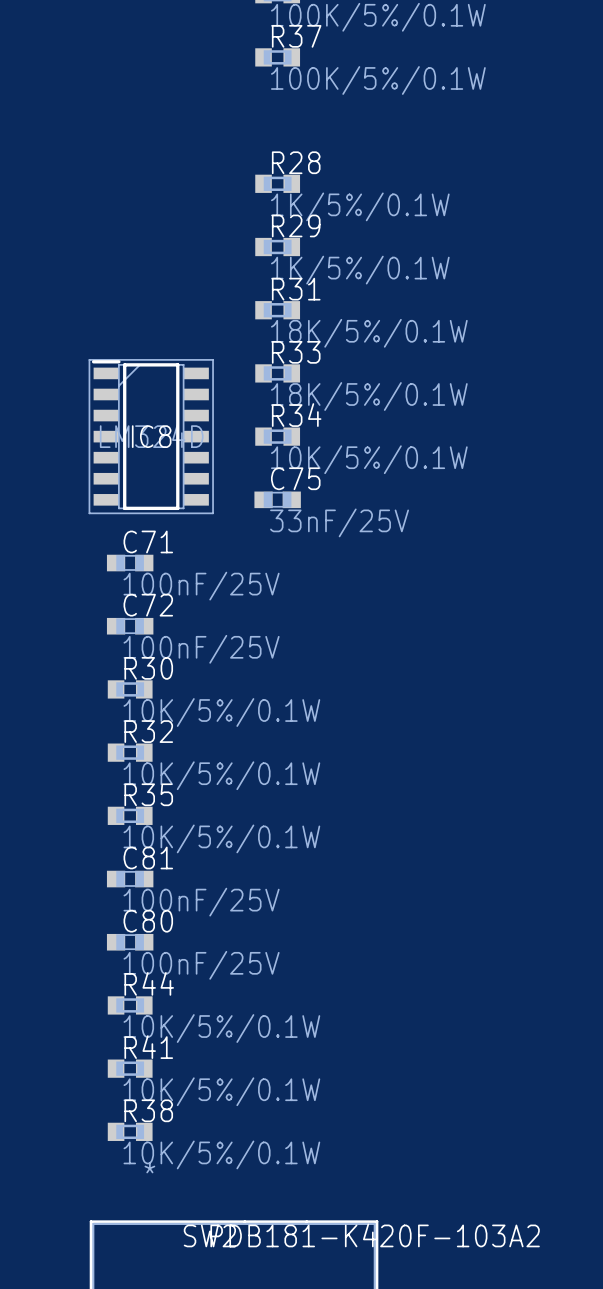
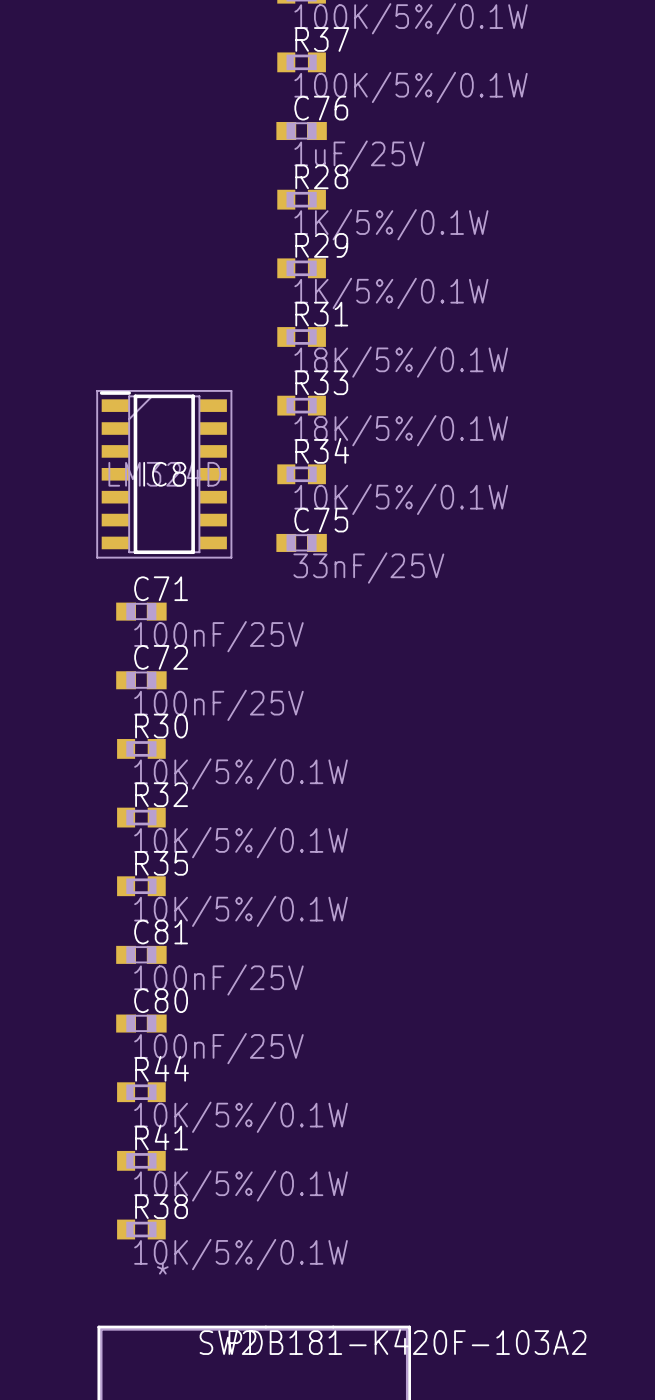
C76: none -> 1uF/25V (301, 131)

